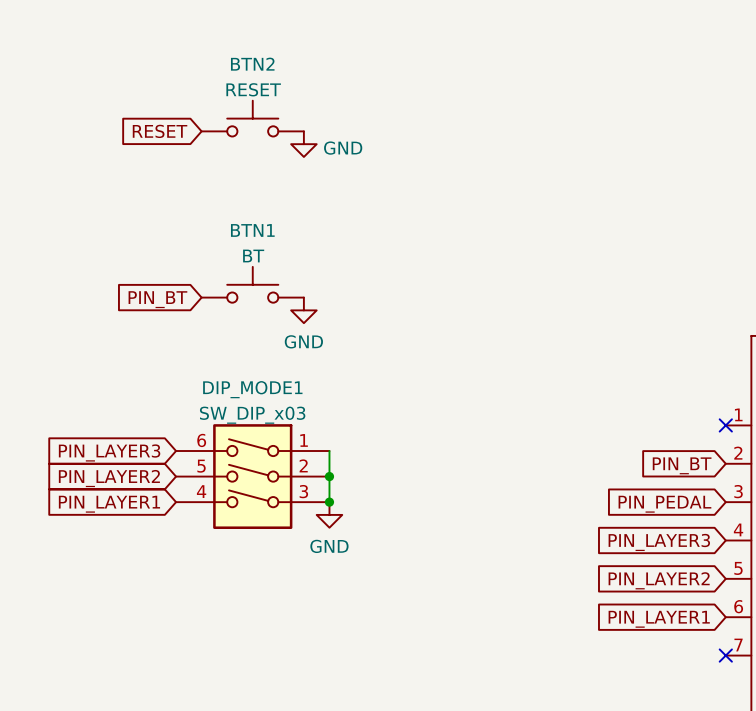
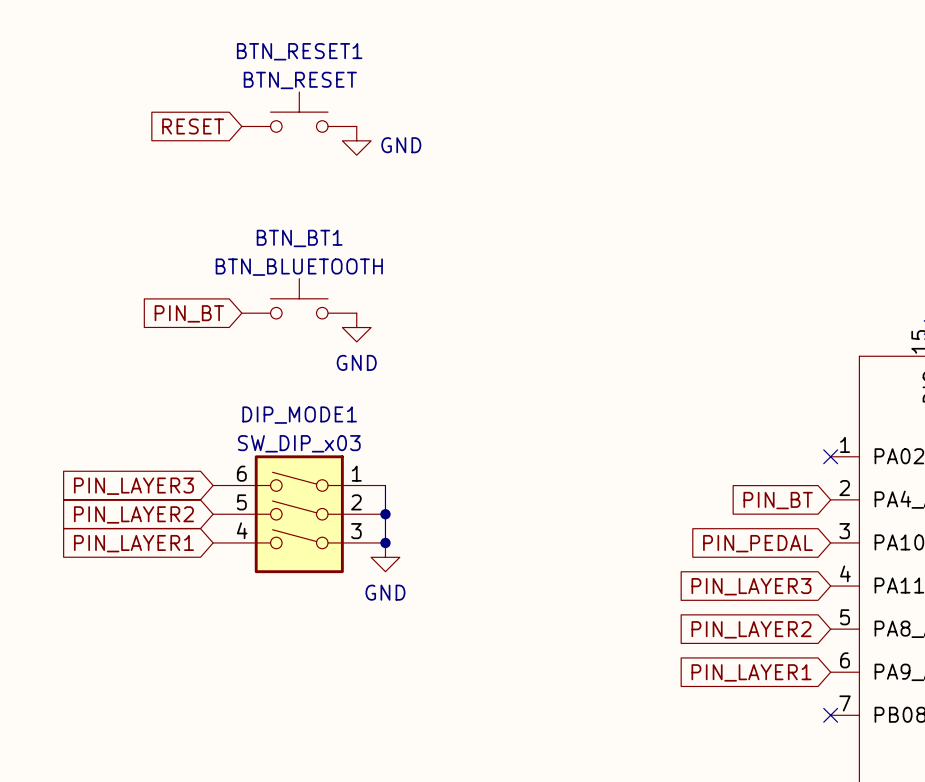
BTN2 name: BTN2 (252, 64) -> BTN_RESET1 (299, 51)
BTN2 value: RESET (253, 89) -> BTN_RESET (300, 80)
BTN1 name: BTN1 (252, 230) -> BTN_BT1 (299, 238)
BTN1 value: BT (253, 255) -> BTN_BLUETOOTH (299, 267)

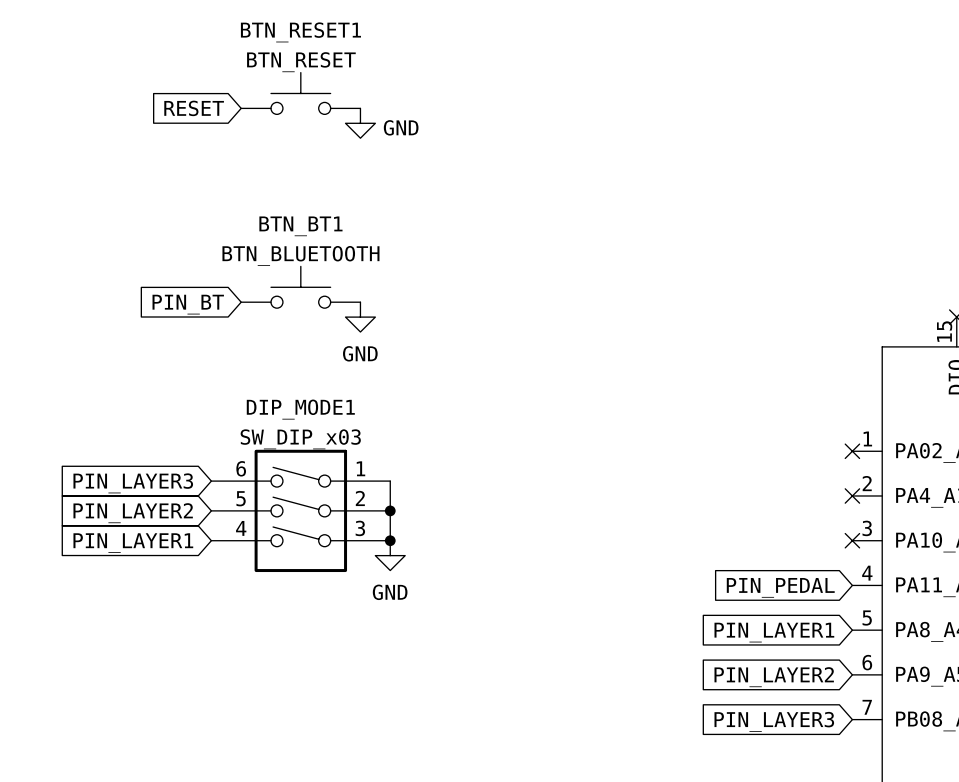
no-connect mark: none -> (852, 495)
global label: PIN_BT (778, 500) -> none
no-connect mark: none -> (852, 540)
global label: PIN_PEDAL (757, 543) -> none
global label: PIN_LAYER3 (751, 586) -> PIN_PEDAL (780, 587)
global label: PIN_LAYER2 (751, 629) -> PIN_LAYER1 (774, 632)
global label: PIN_LAYER1 (751, 672) -> PIN_LAYER2 (774, 677)
global label: none -> PIN_LAYER3 (774, 721)
no-connect mark: (830, 715) -> none

